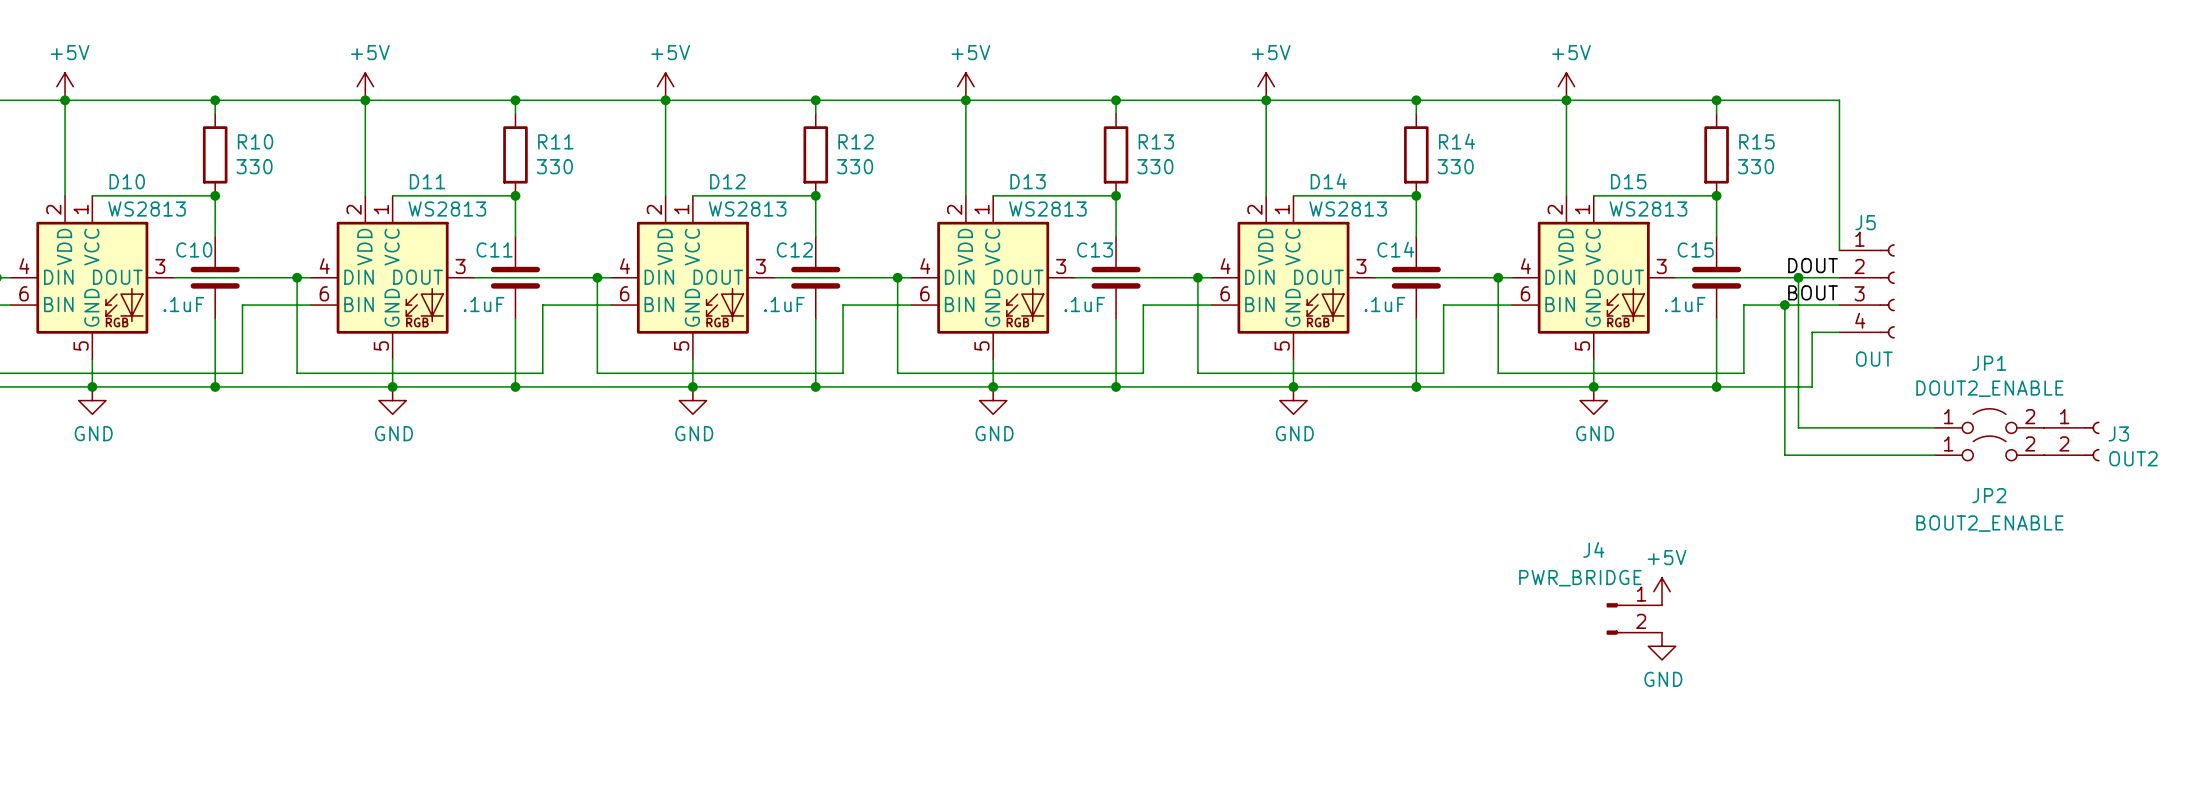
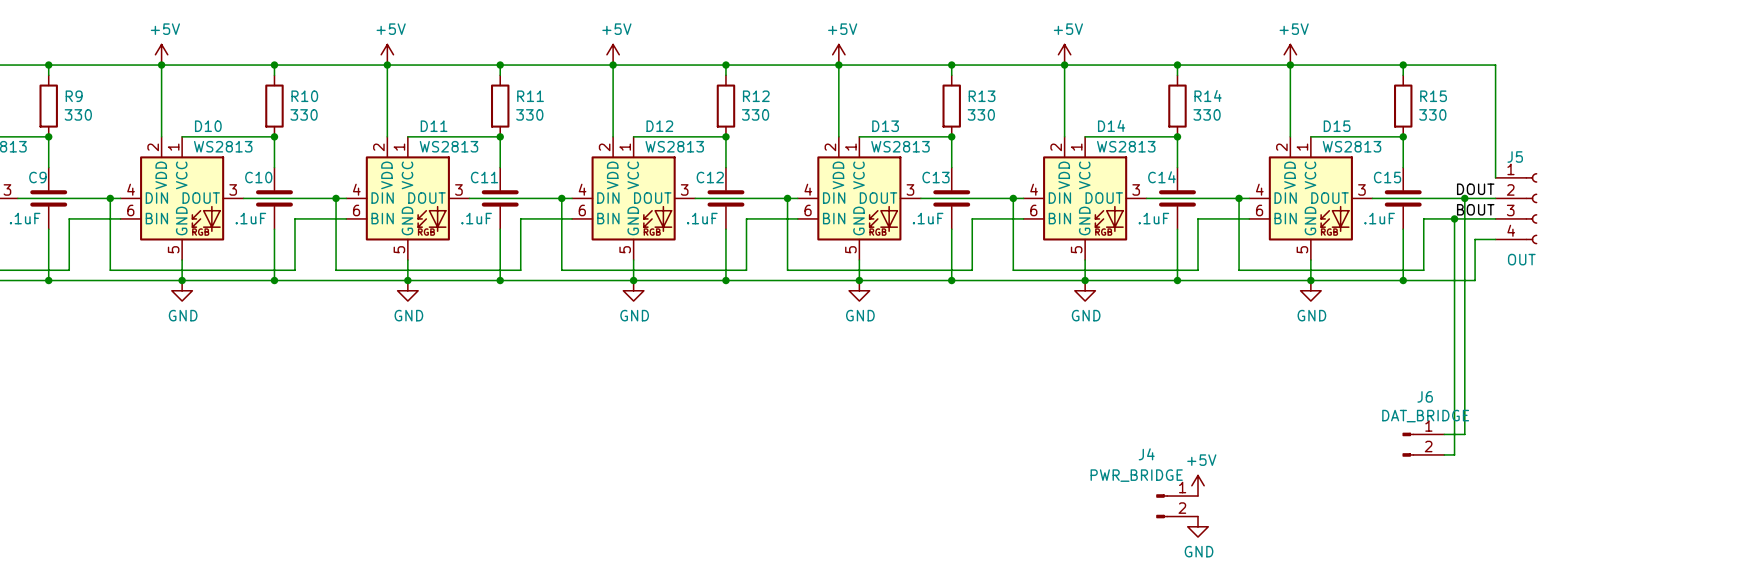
JP1: DOUT2_ENABLE (1989, 421) -> none
wire: (1798, 427) (1934, 427) -> (1464, 311) (1464, 434) (1444, 434)
J3: OUT2 (2071, 441) -> none
JP2: BOUT2_ENABLE (1989, 448) -> none
wire: (1784, 455) (1934, 455) -> (1454, 331) (1454, 454) (1444, 454)
power symbol position: +5V (1662, 591) -> +5V (1198, 485)
J6: none -> DAT_BRIDGE (1423, 444)
J4 position: (1634, 618) -> (1177, 506)
power symbol position: GND (1662, 646) -> GND (1198, 526)

